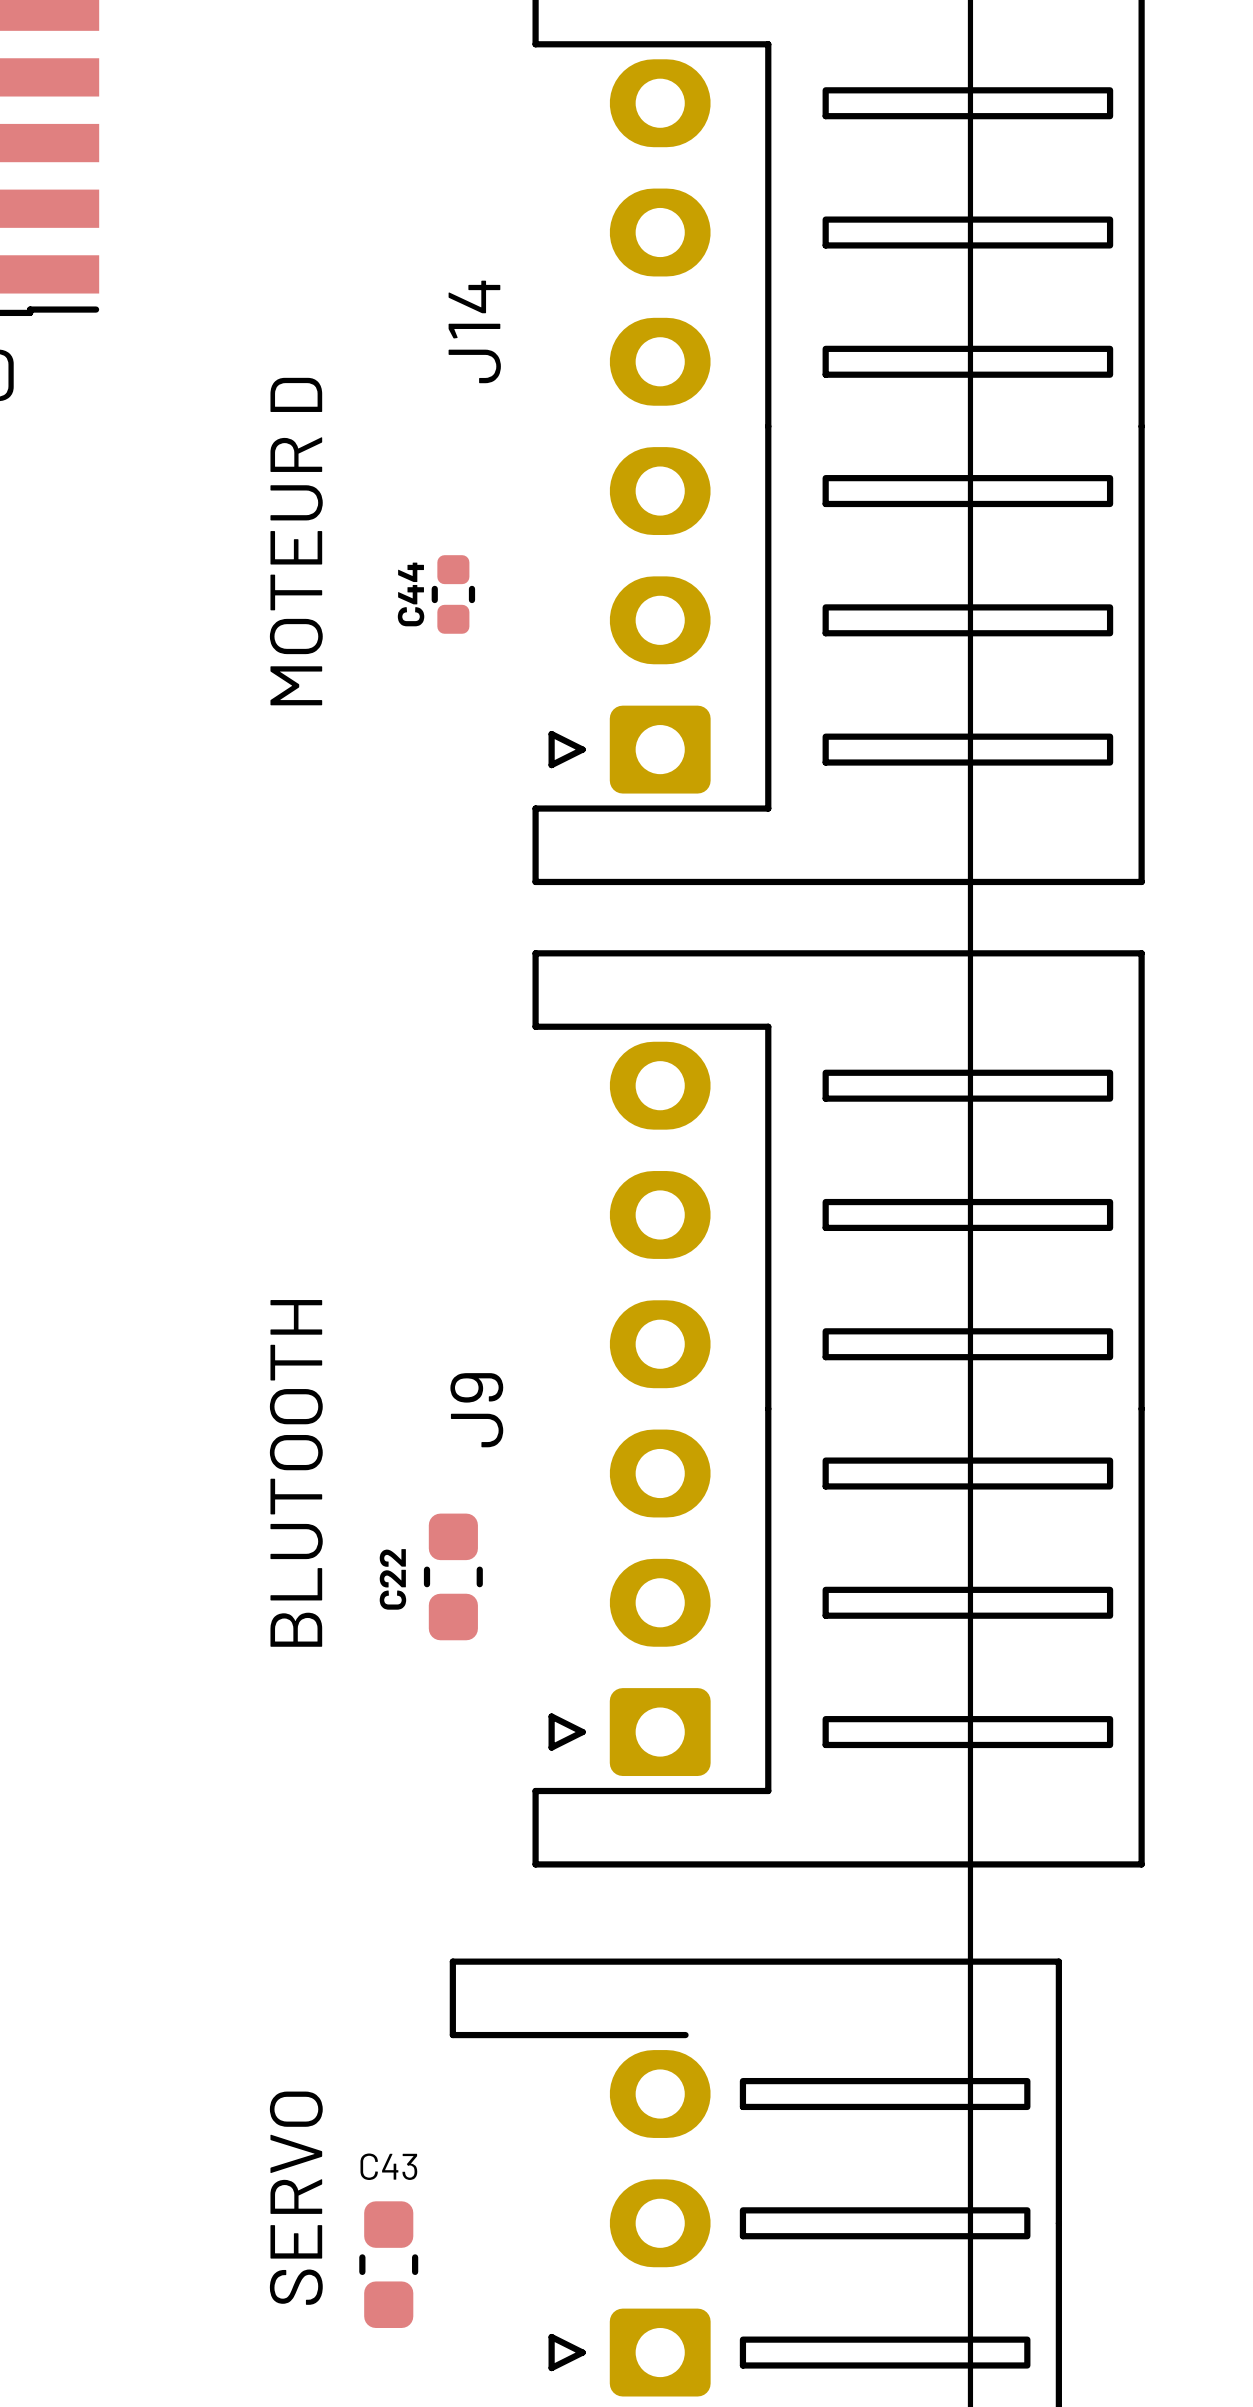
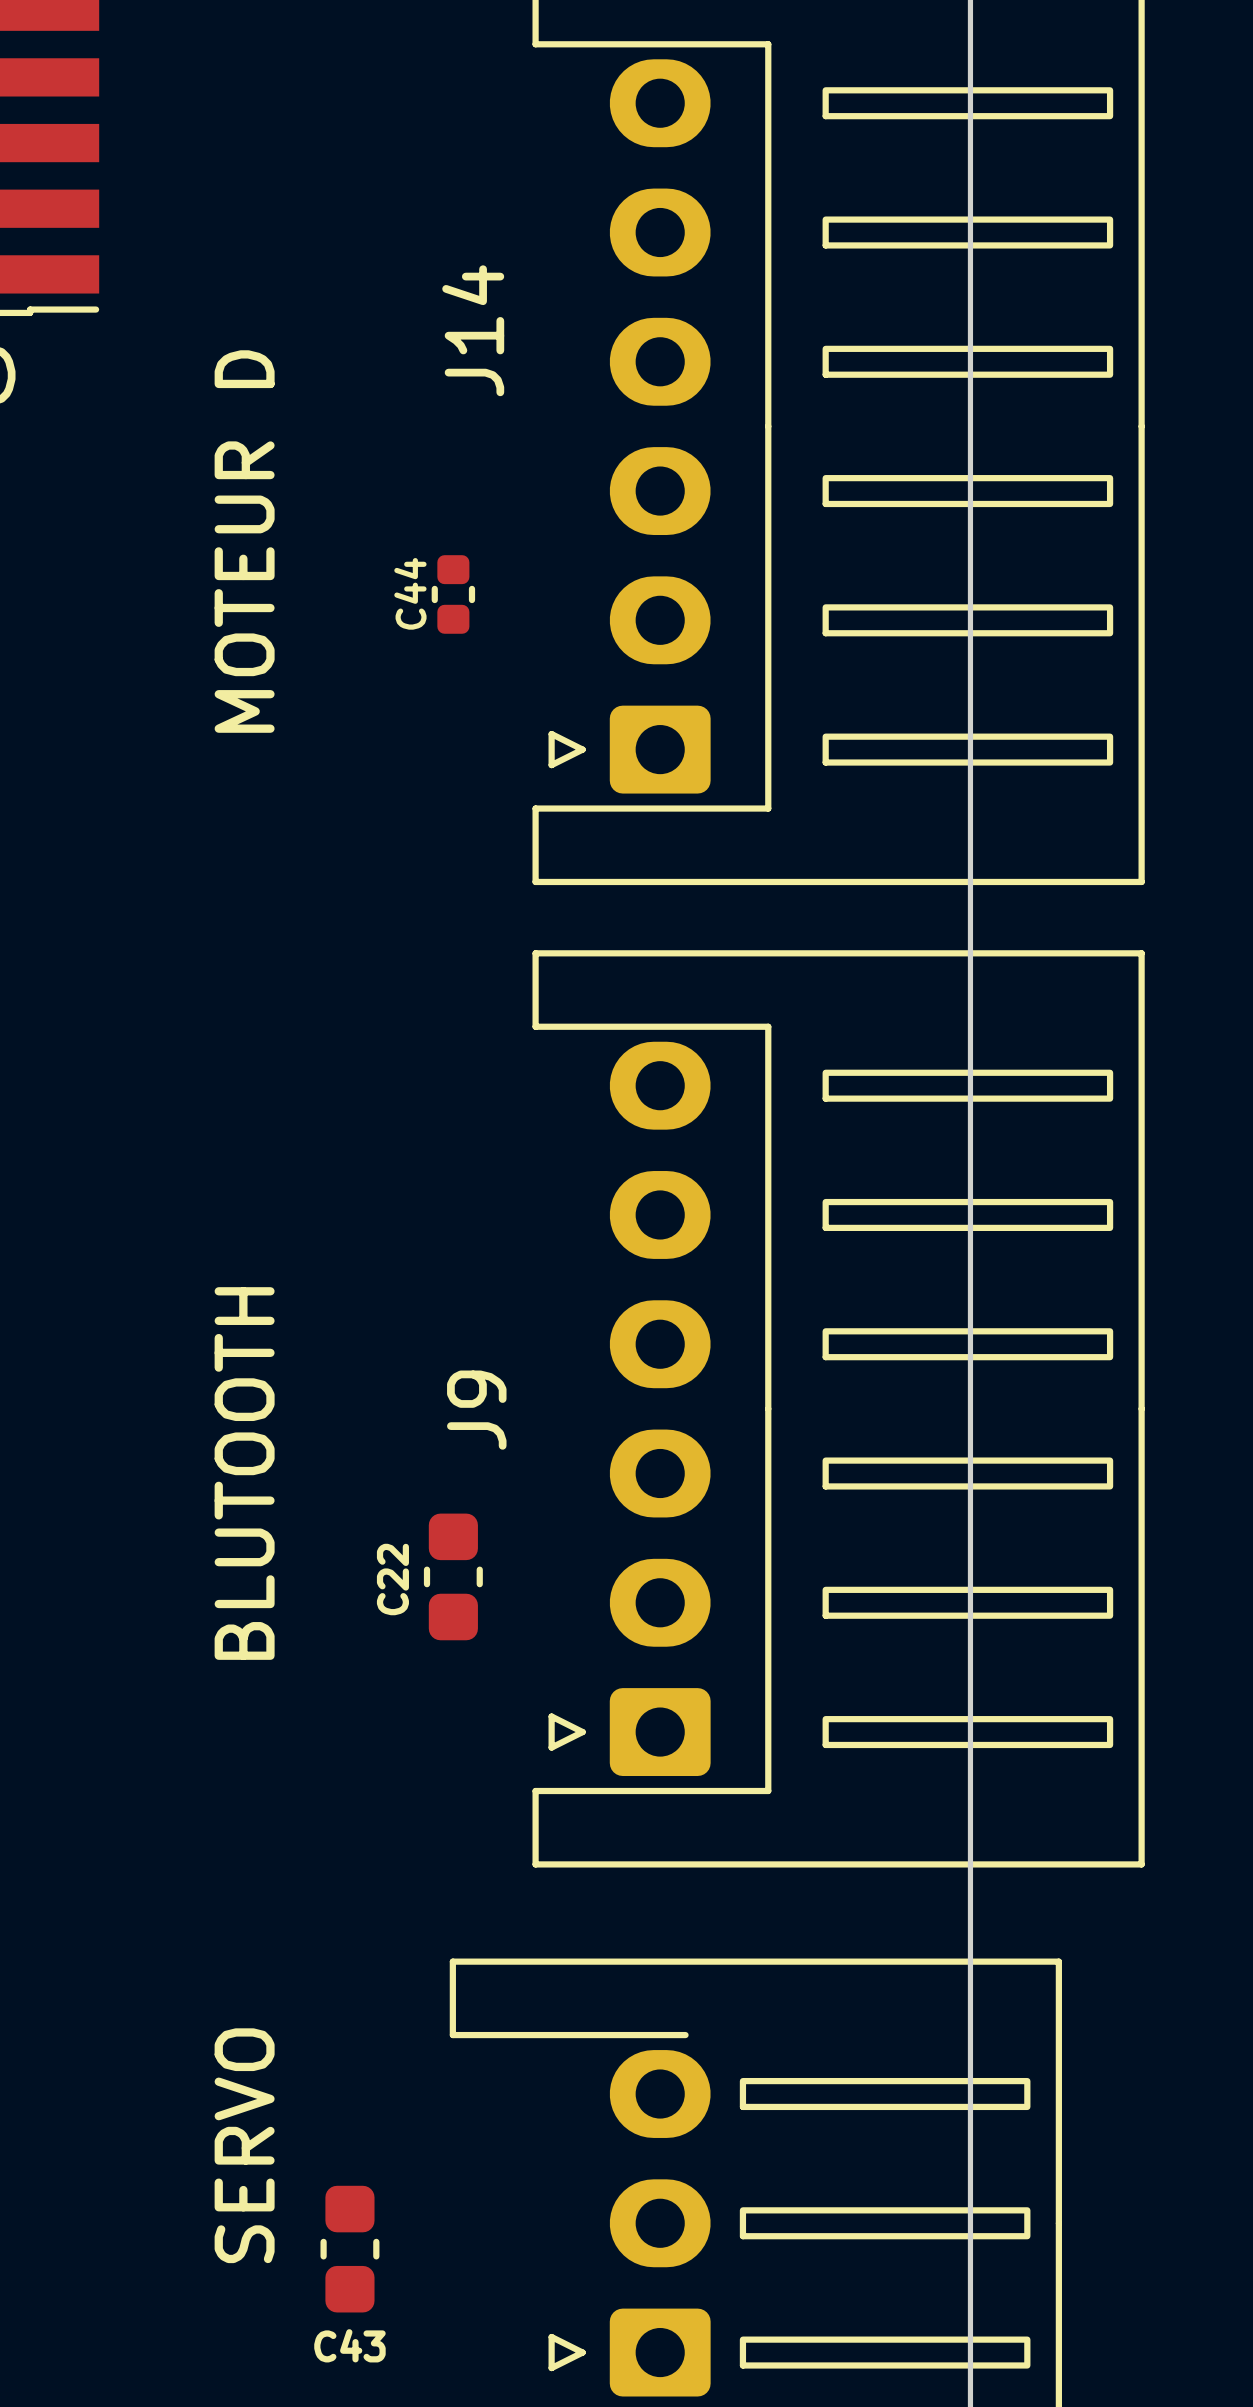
text position: MOTEUR D (296, 541) -> MOTEUR D (244, 541)
text position: BLUTOOTH (296, 1473) -> BLUTOOTH (244, 1473)
C43 name position: C43 (388, 2166) -> C43 (349, 2345)
text position: SERVO (296, 2198) -> SERVO (244, 2145)
C43 position: (388, 2264) -> (349, 2249)

